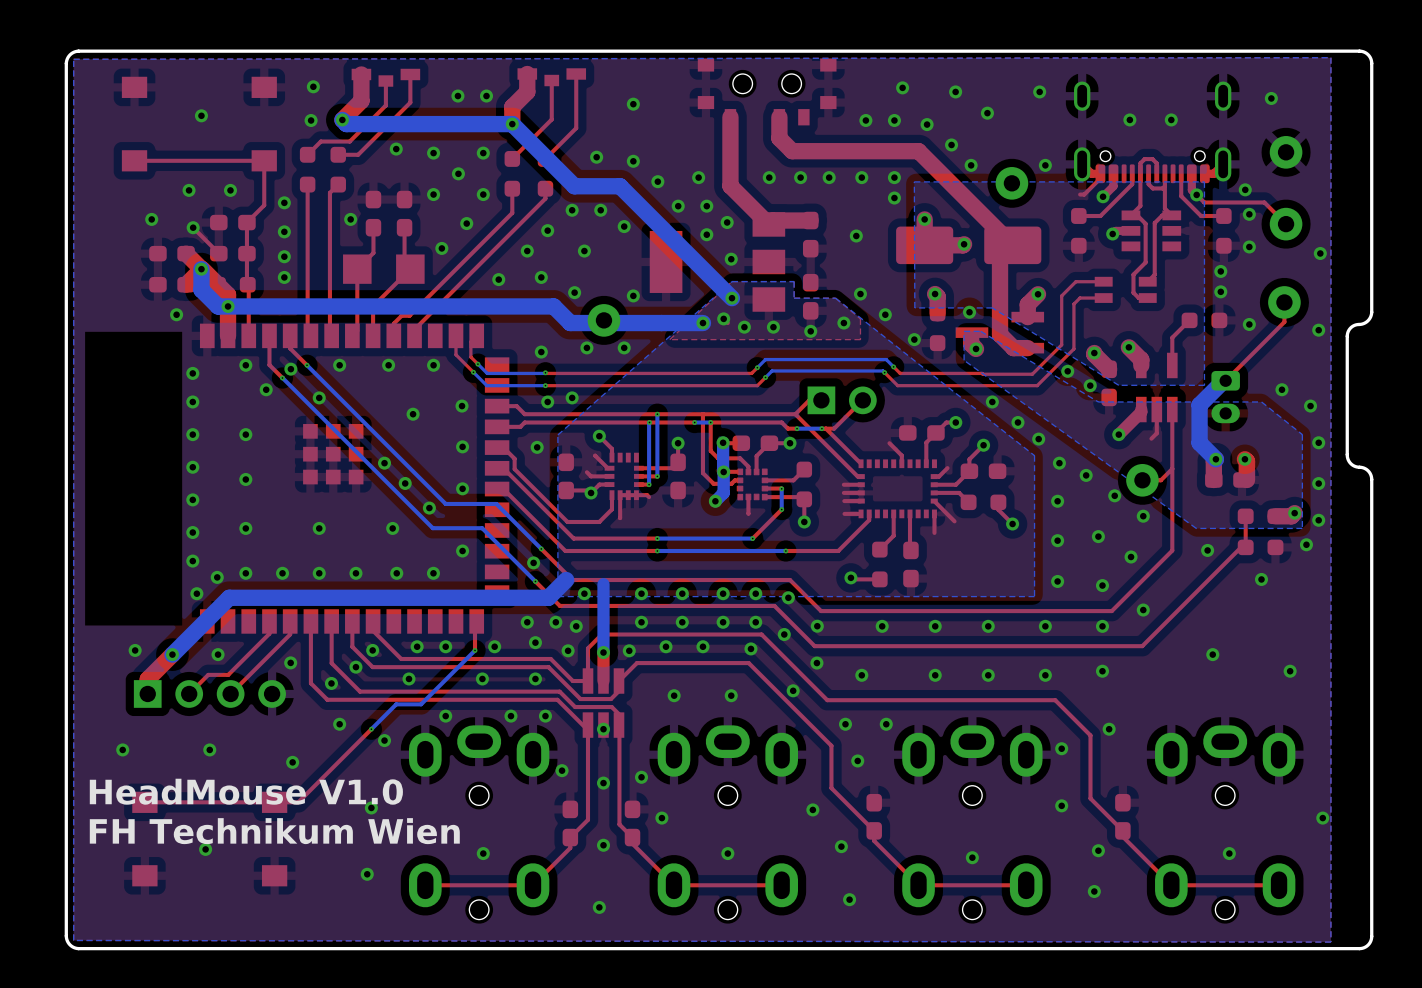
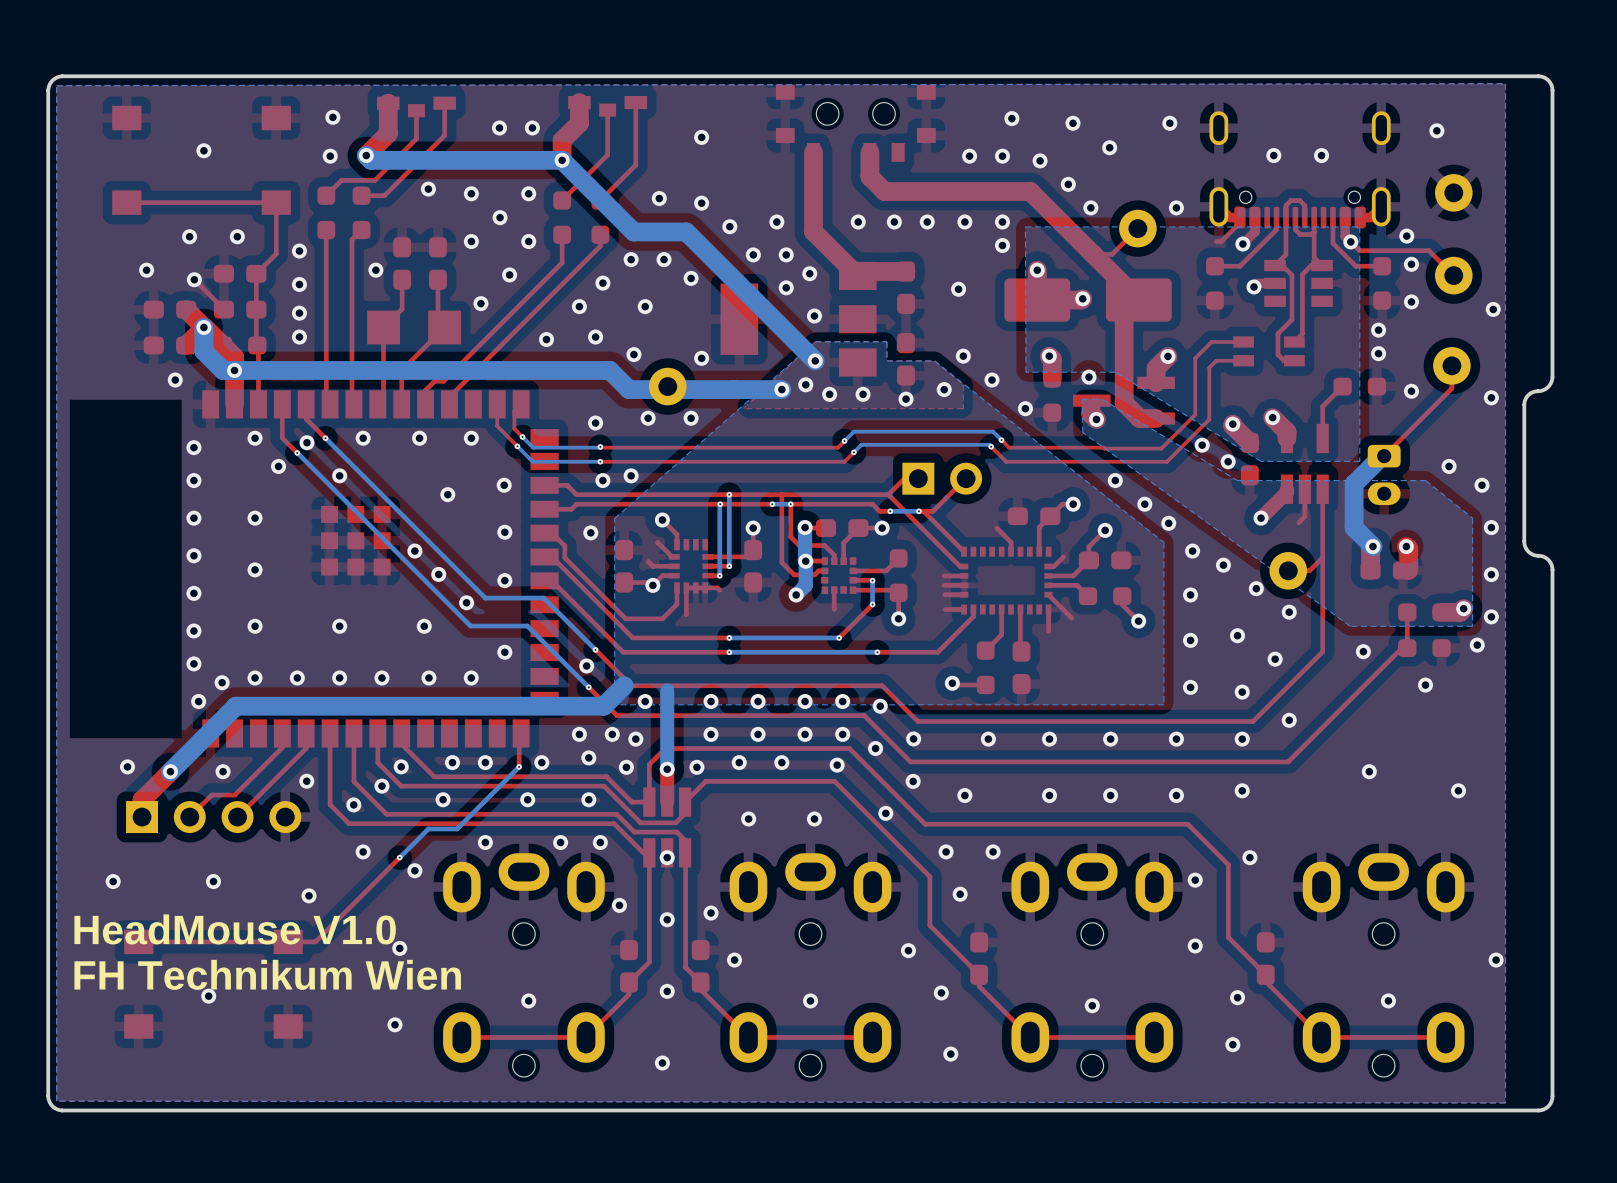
top track: none -> (1137, 228) (1112, 254) (1093, 254)

